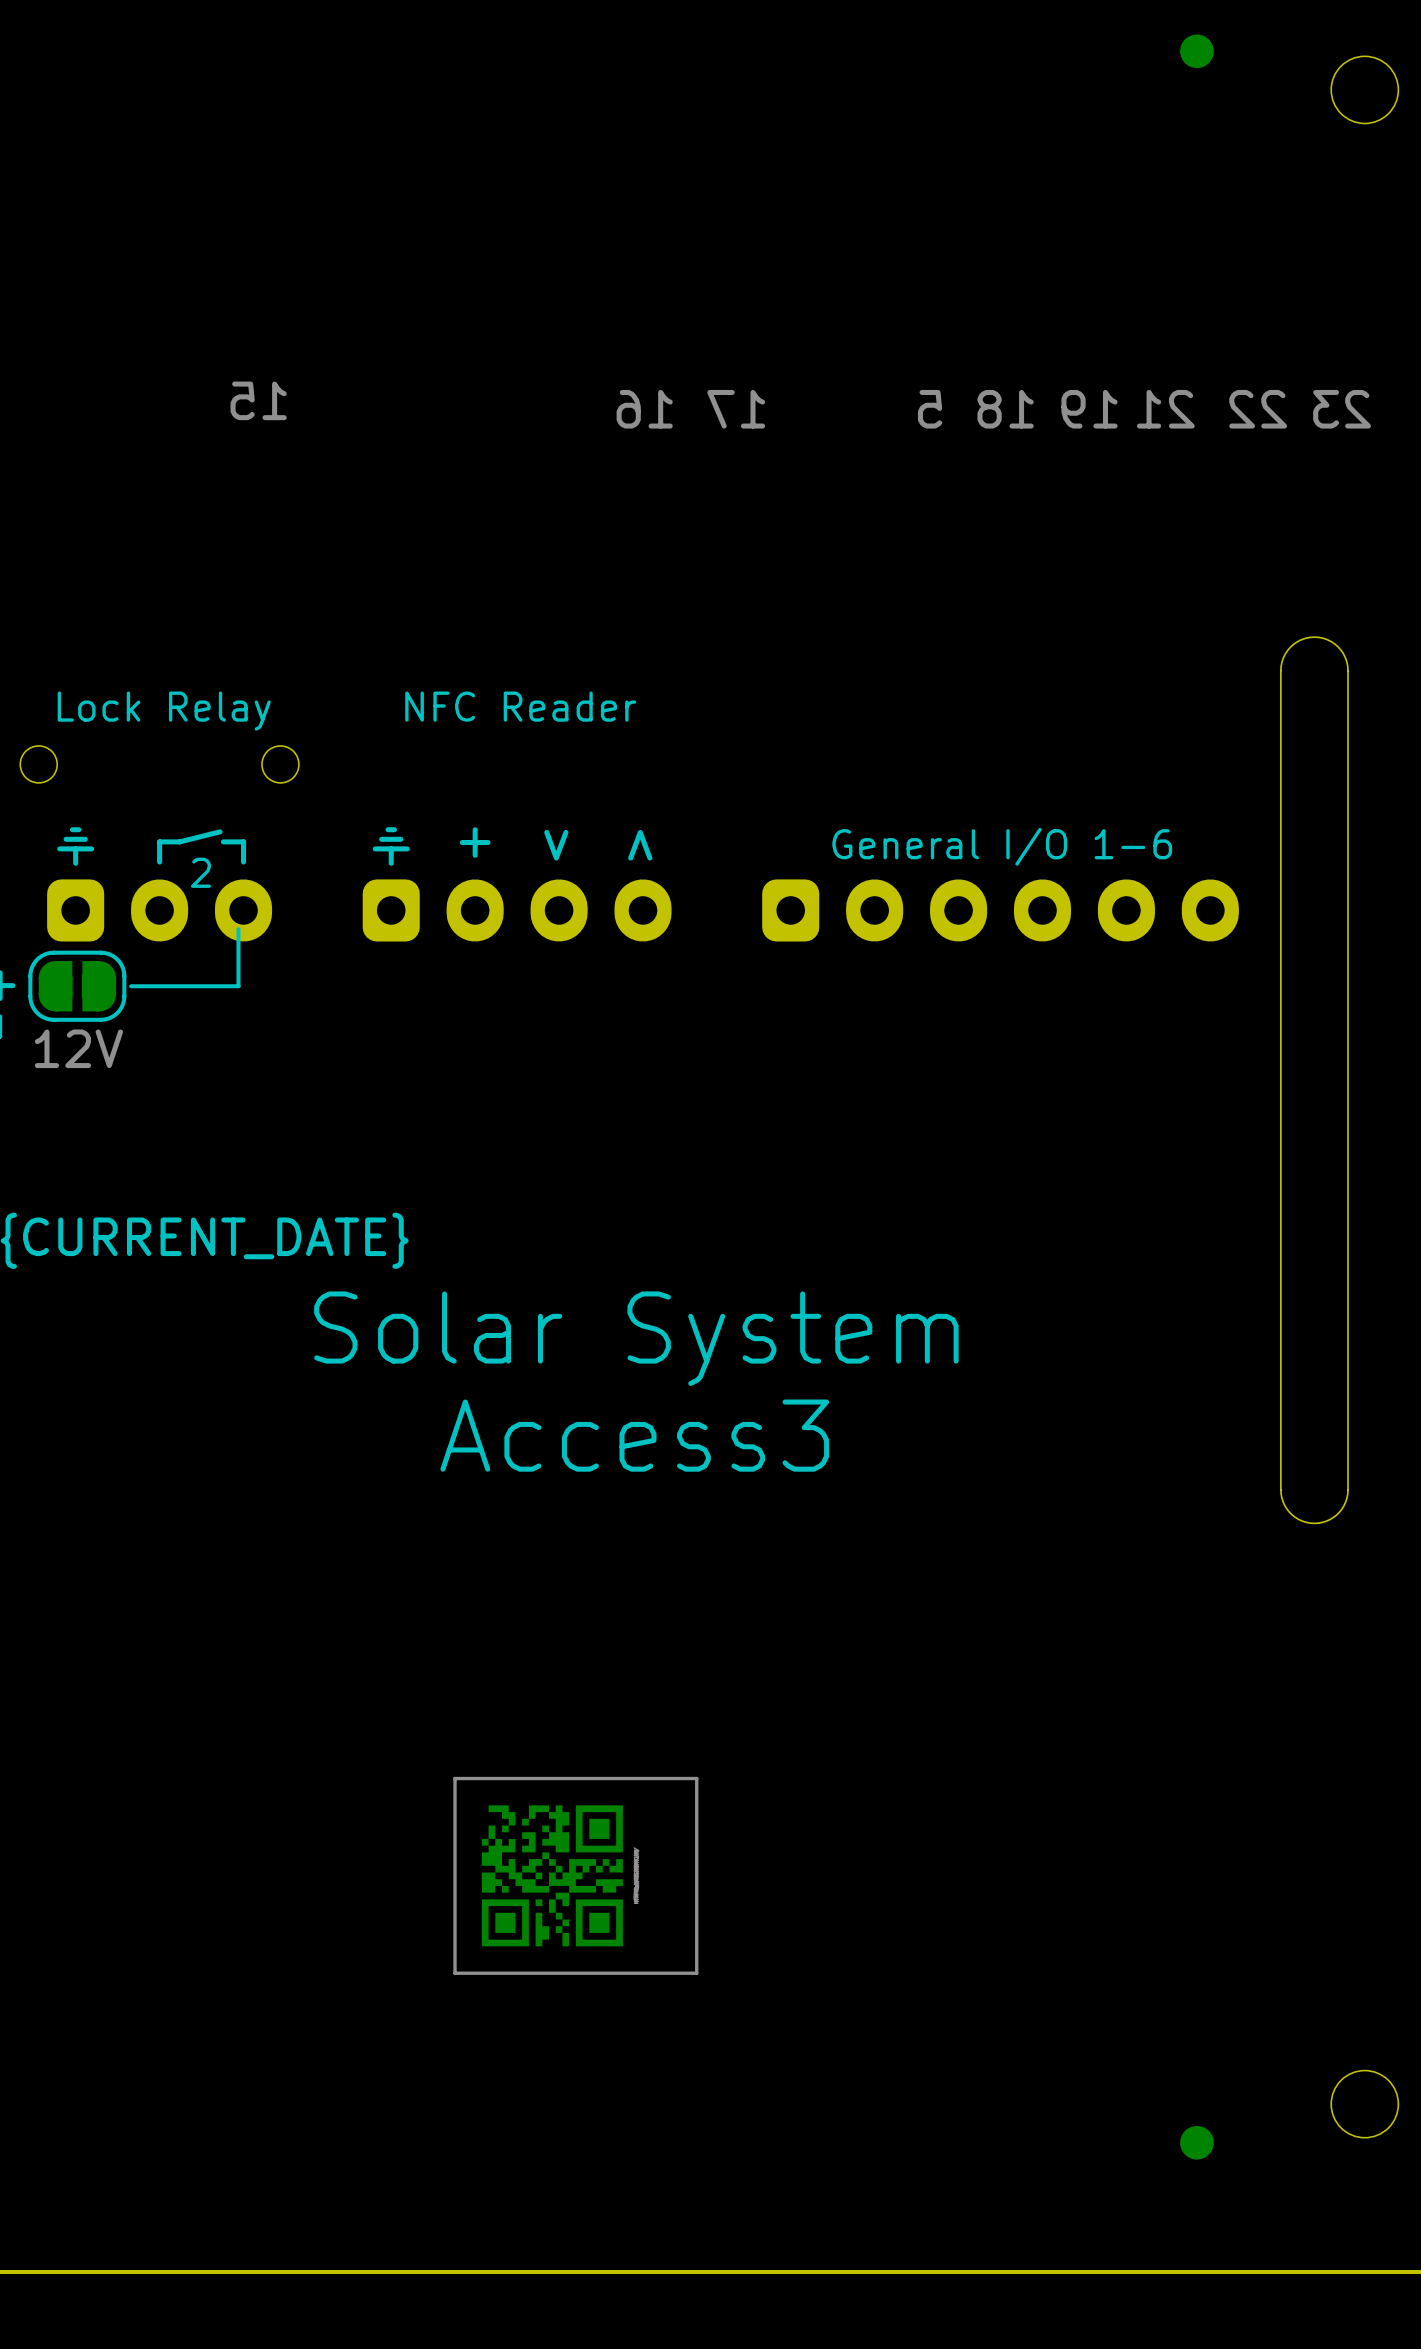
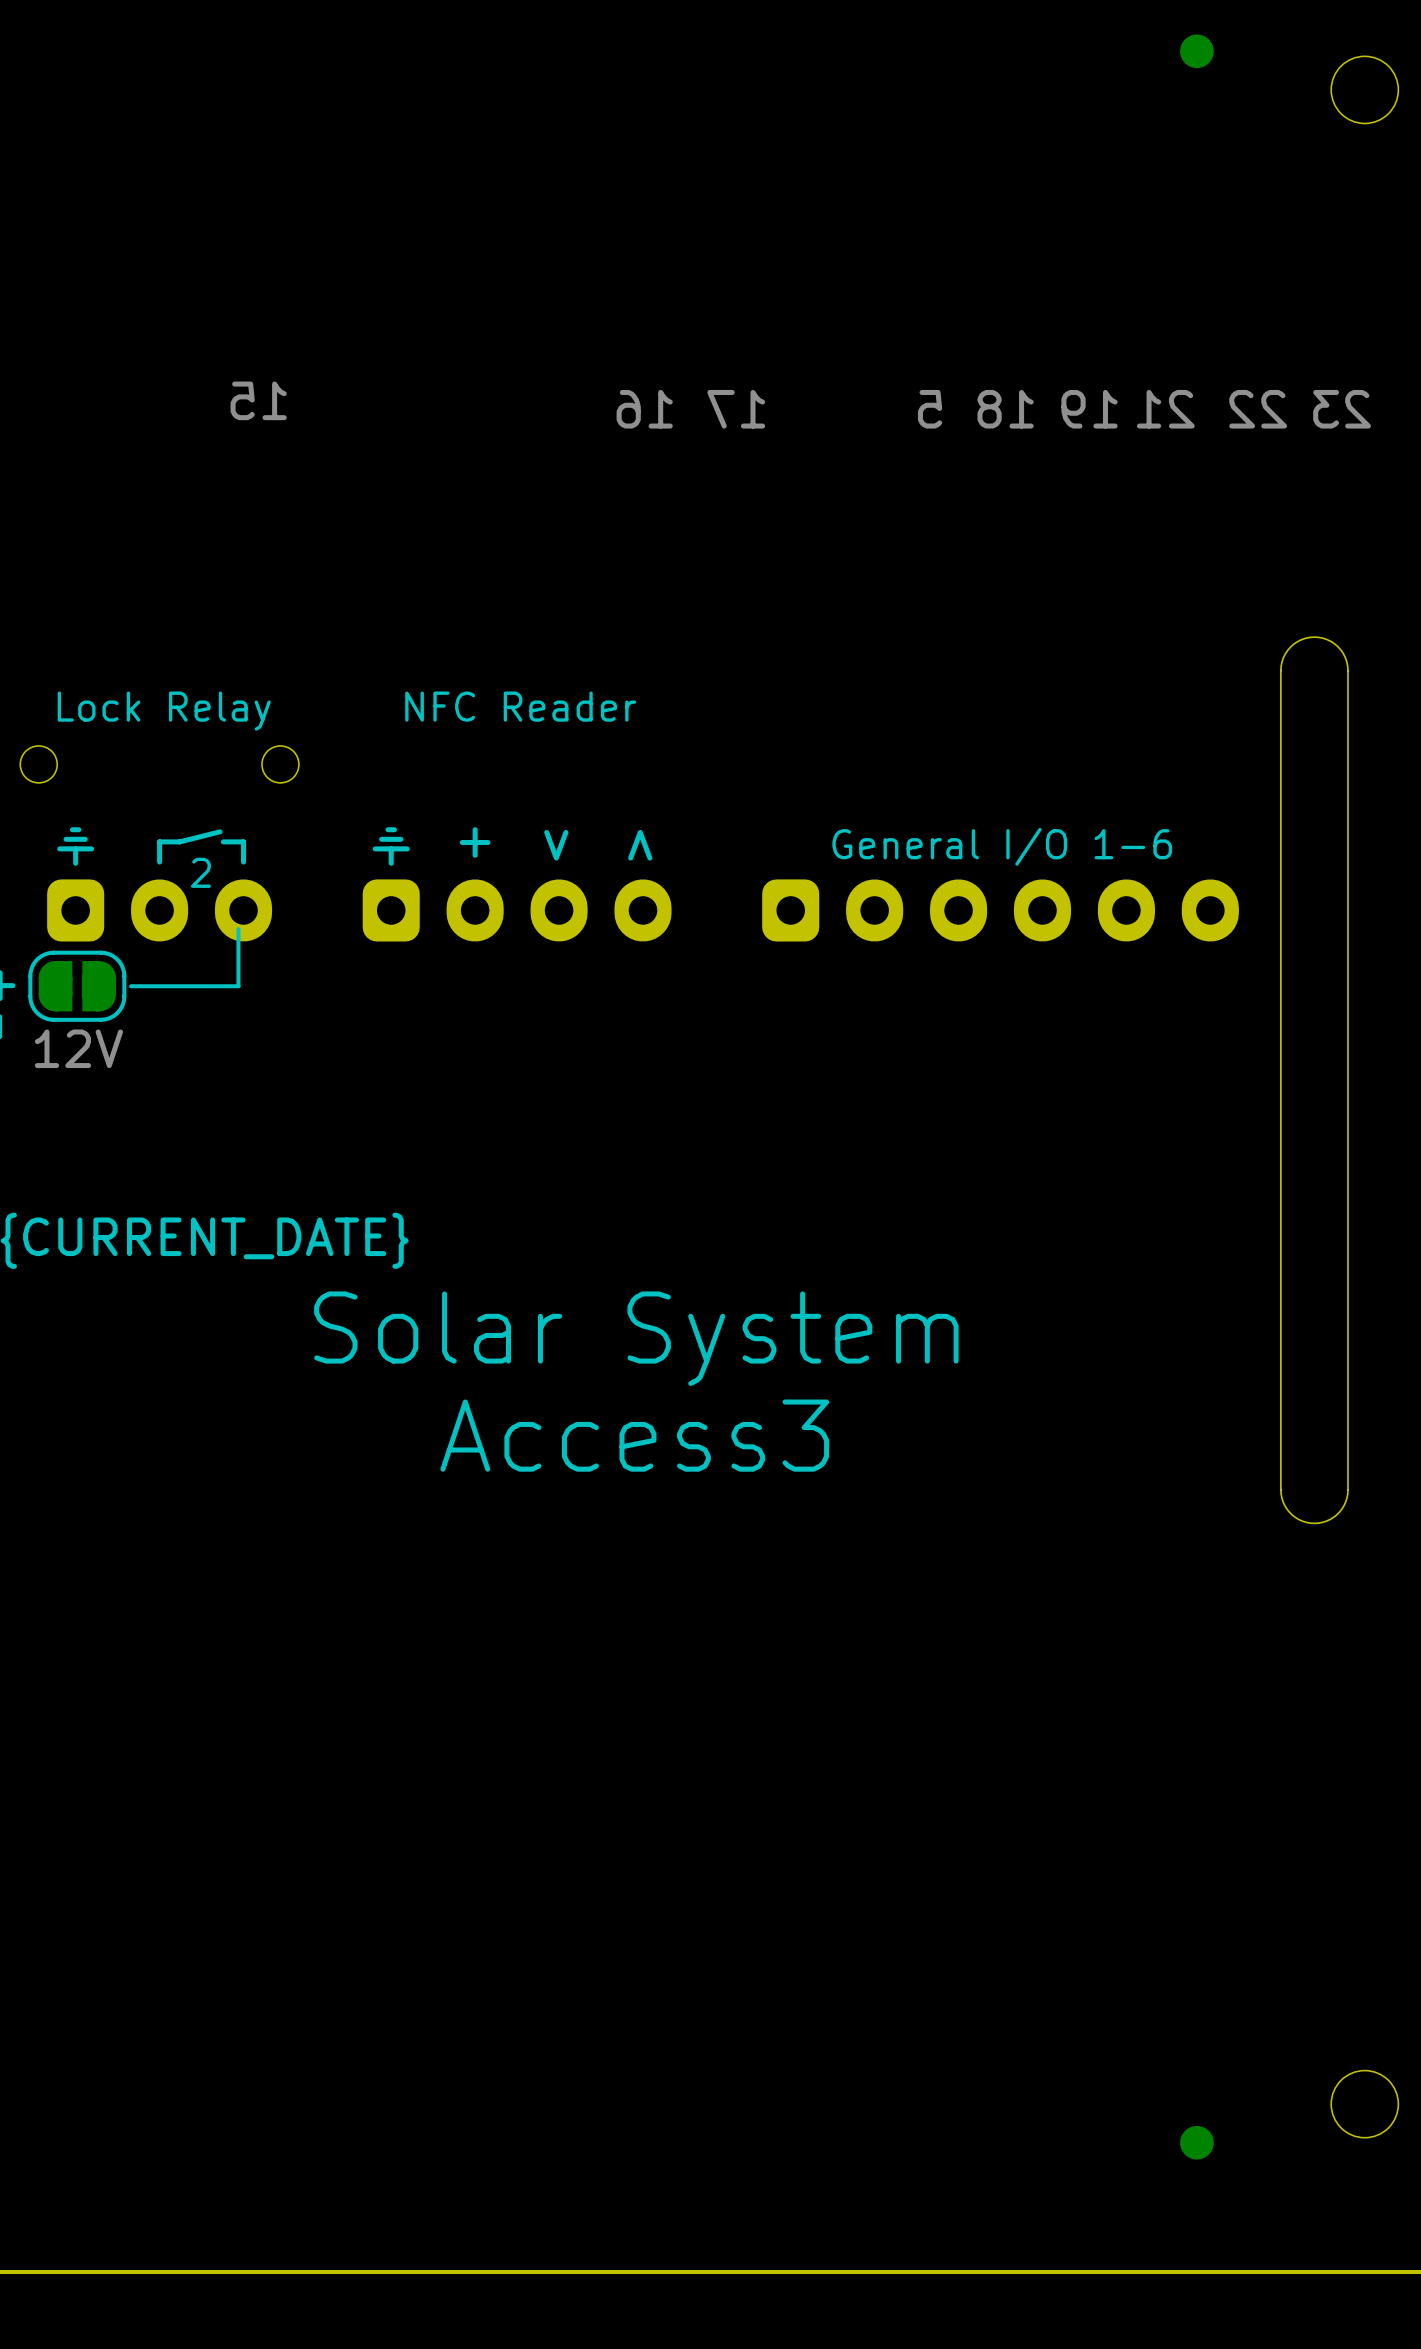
part: (575, 1875) -> none

